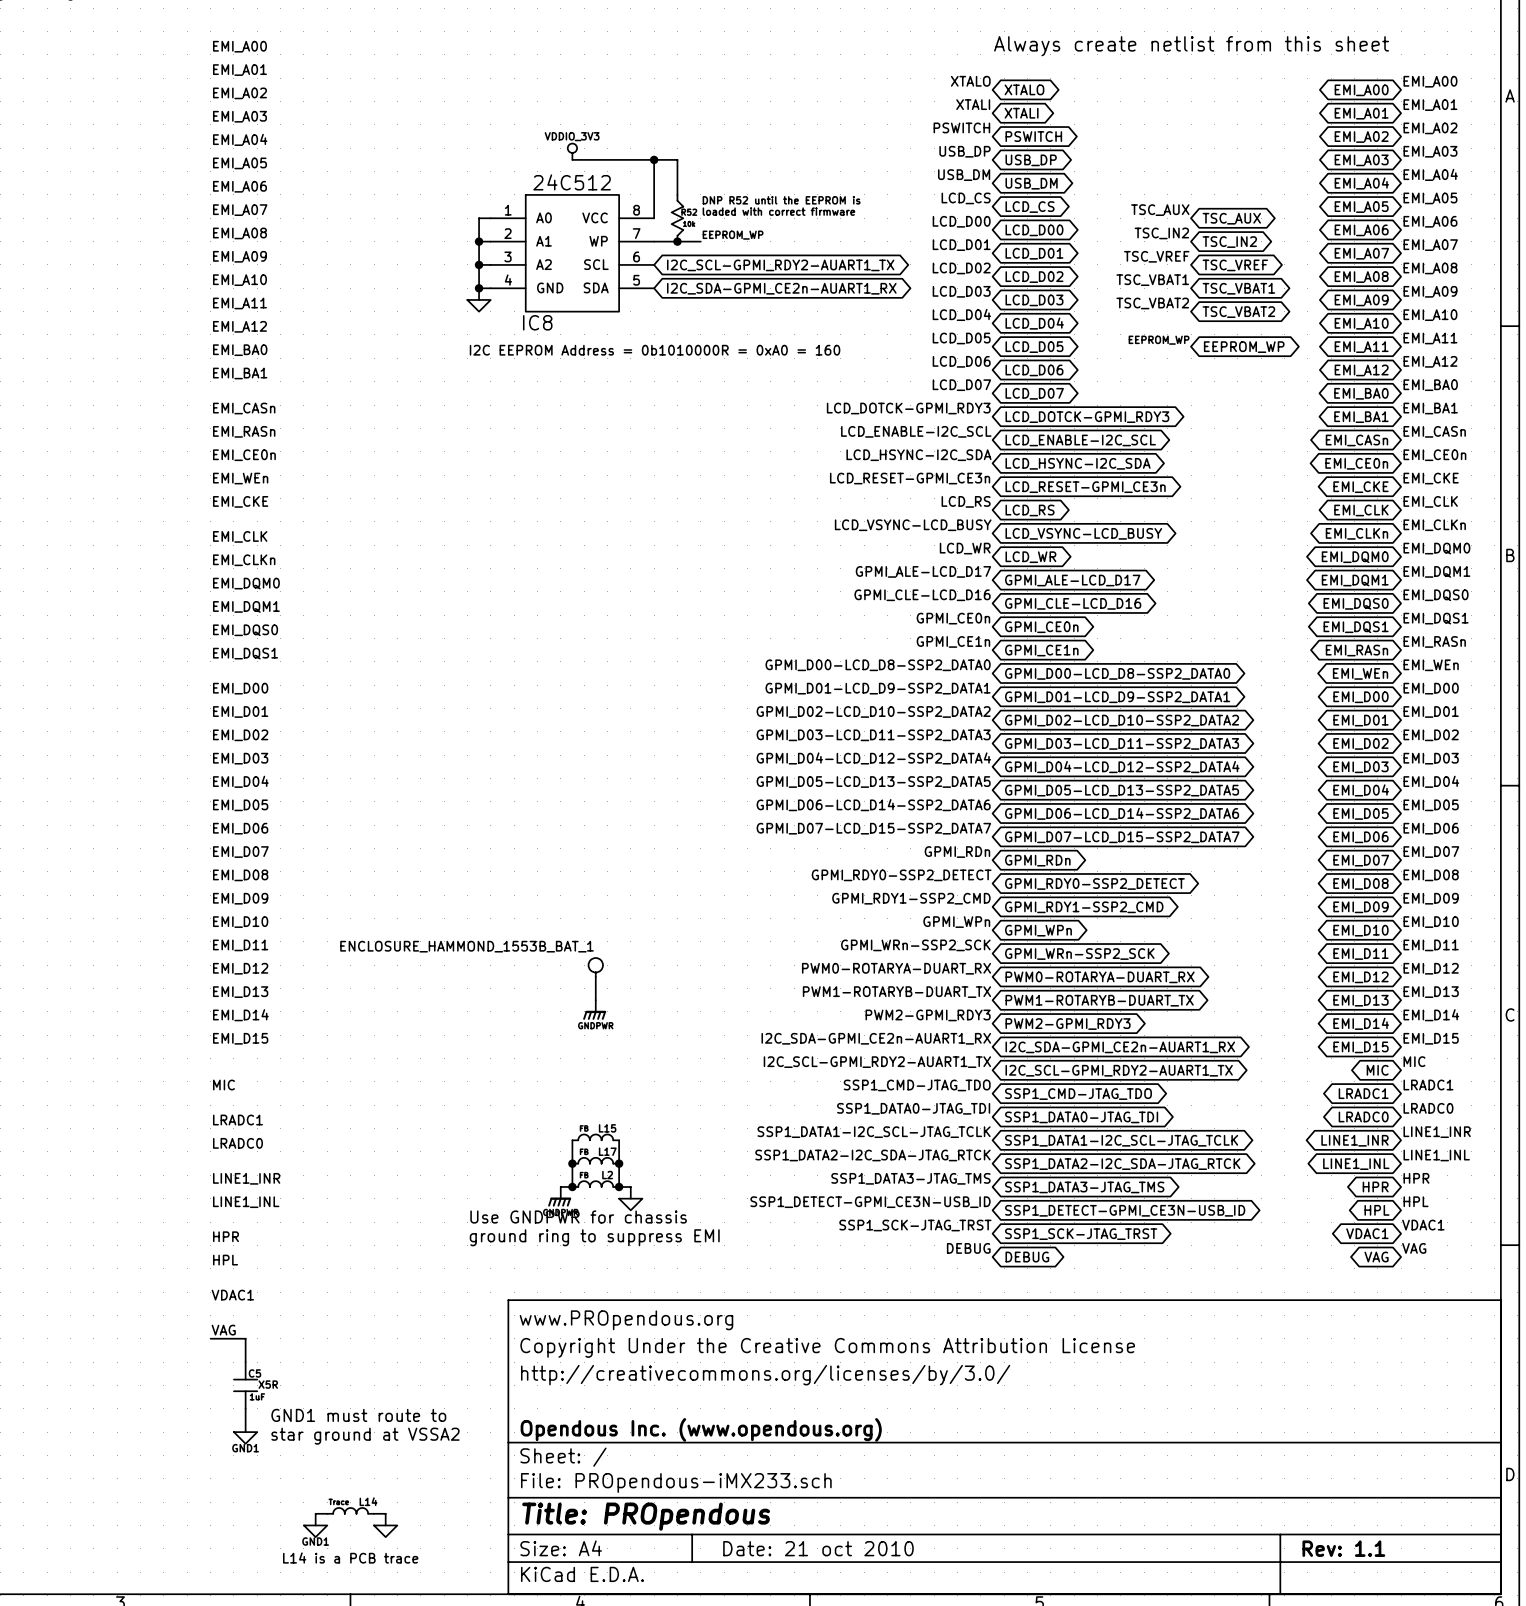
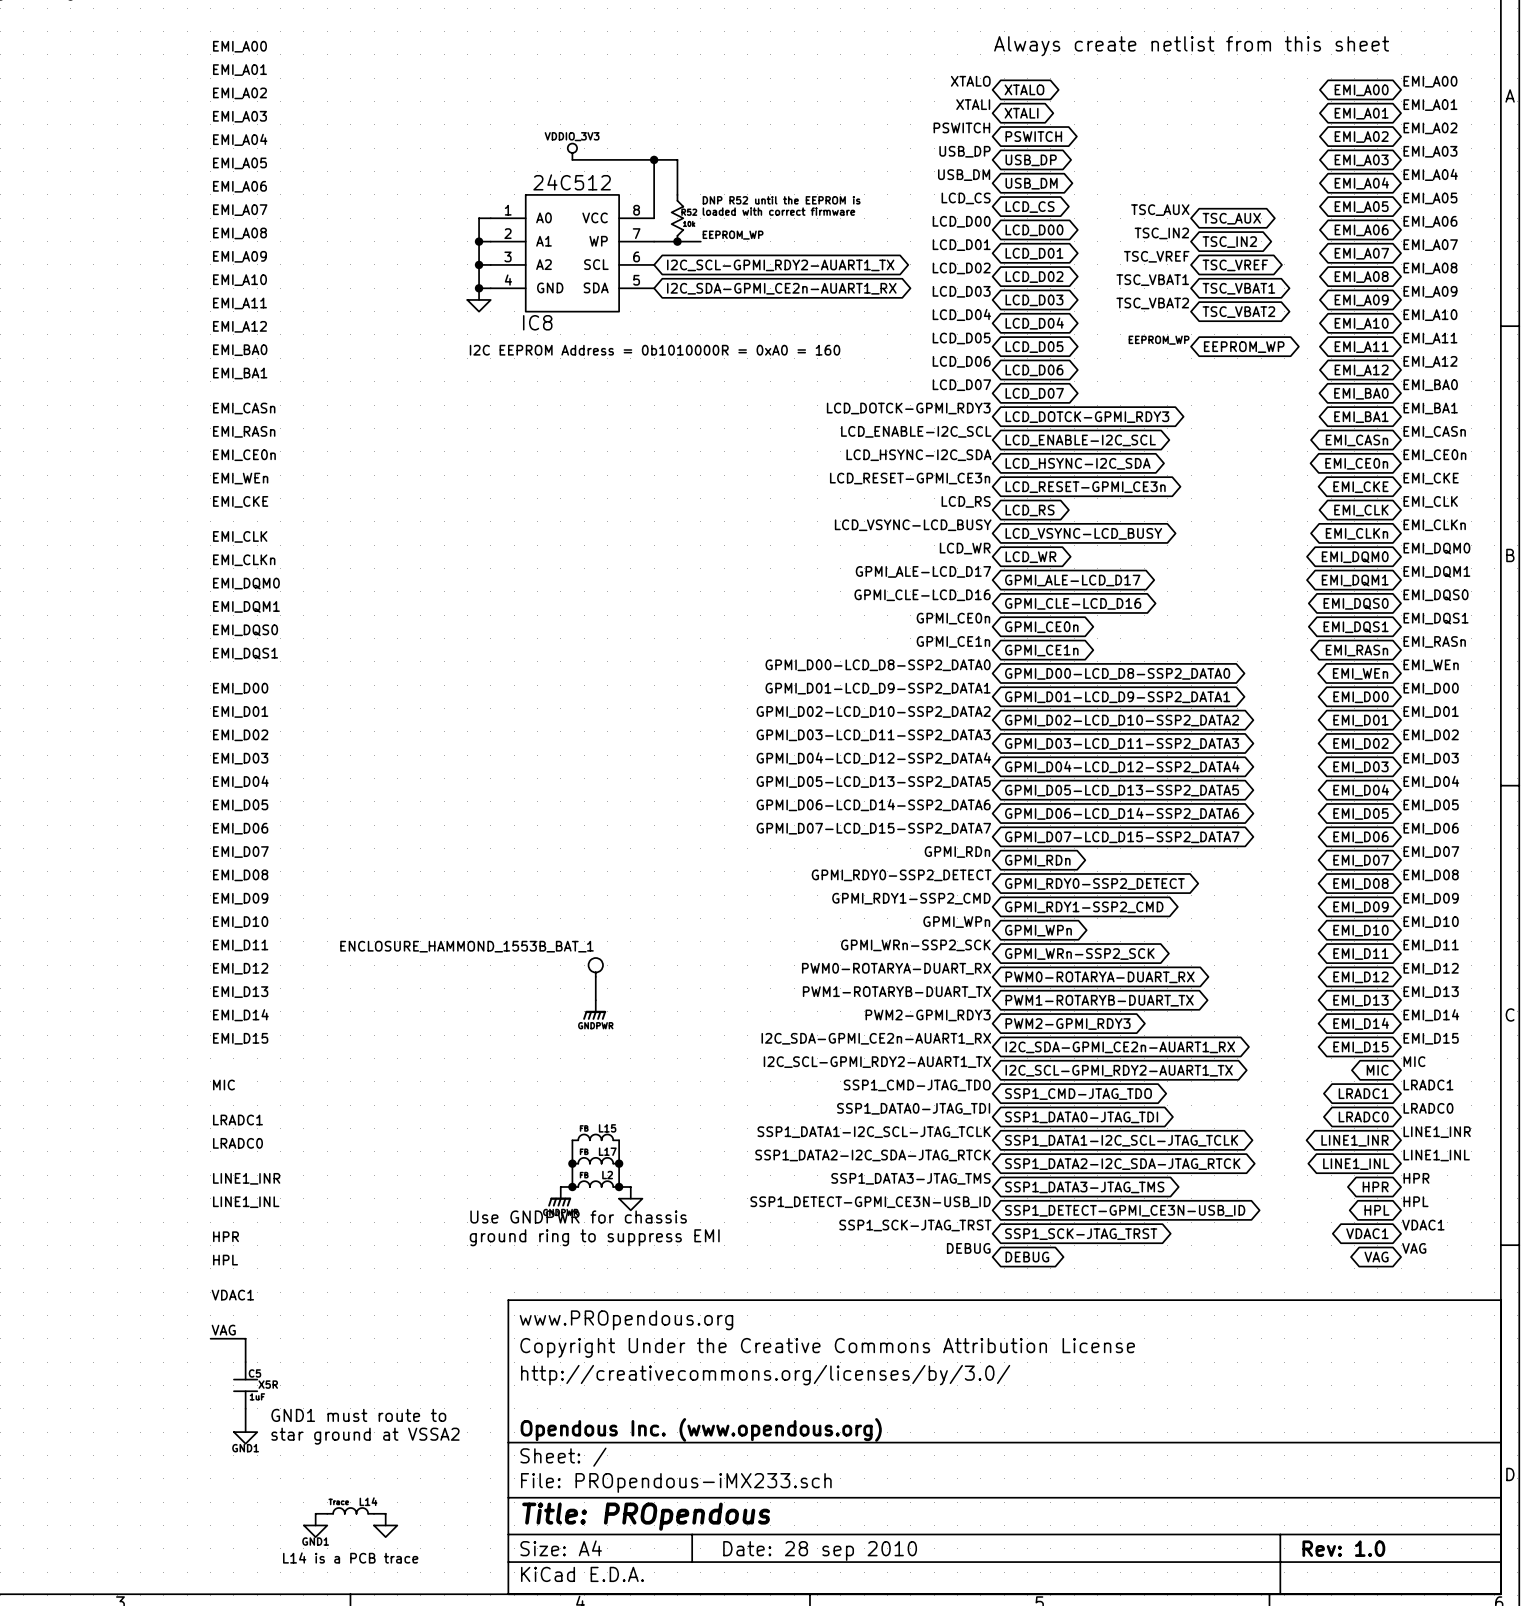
title block: Date: 21 oct 2010 (818, 1548) -> Date: 28 sep 2010 (820, 1550)
title block: Rev: 1.1 (1343, 1548) -> Rev: 1.0 (1343, 1548)

